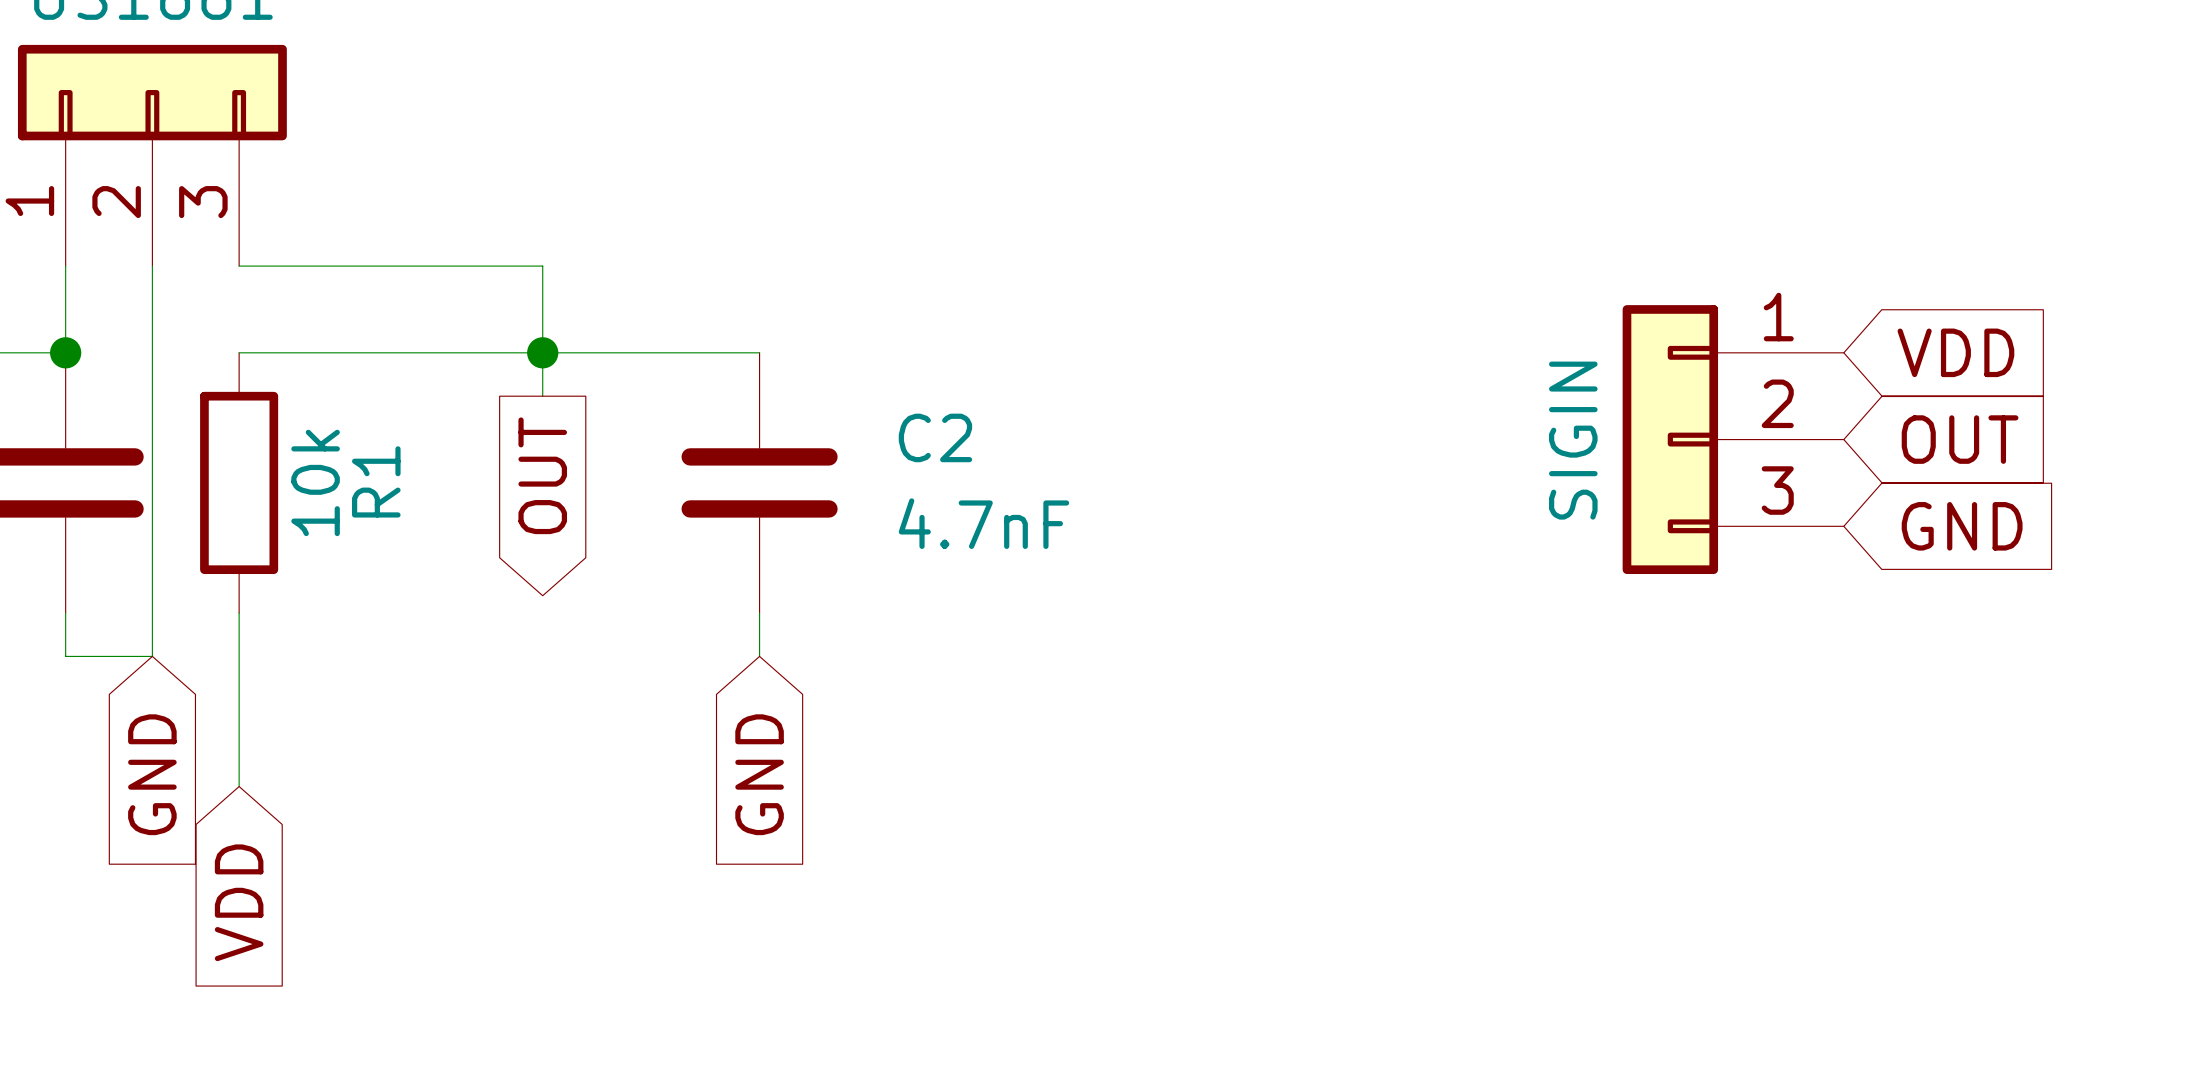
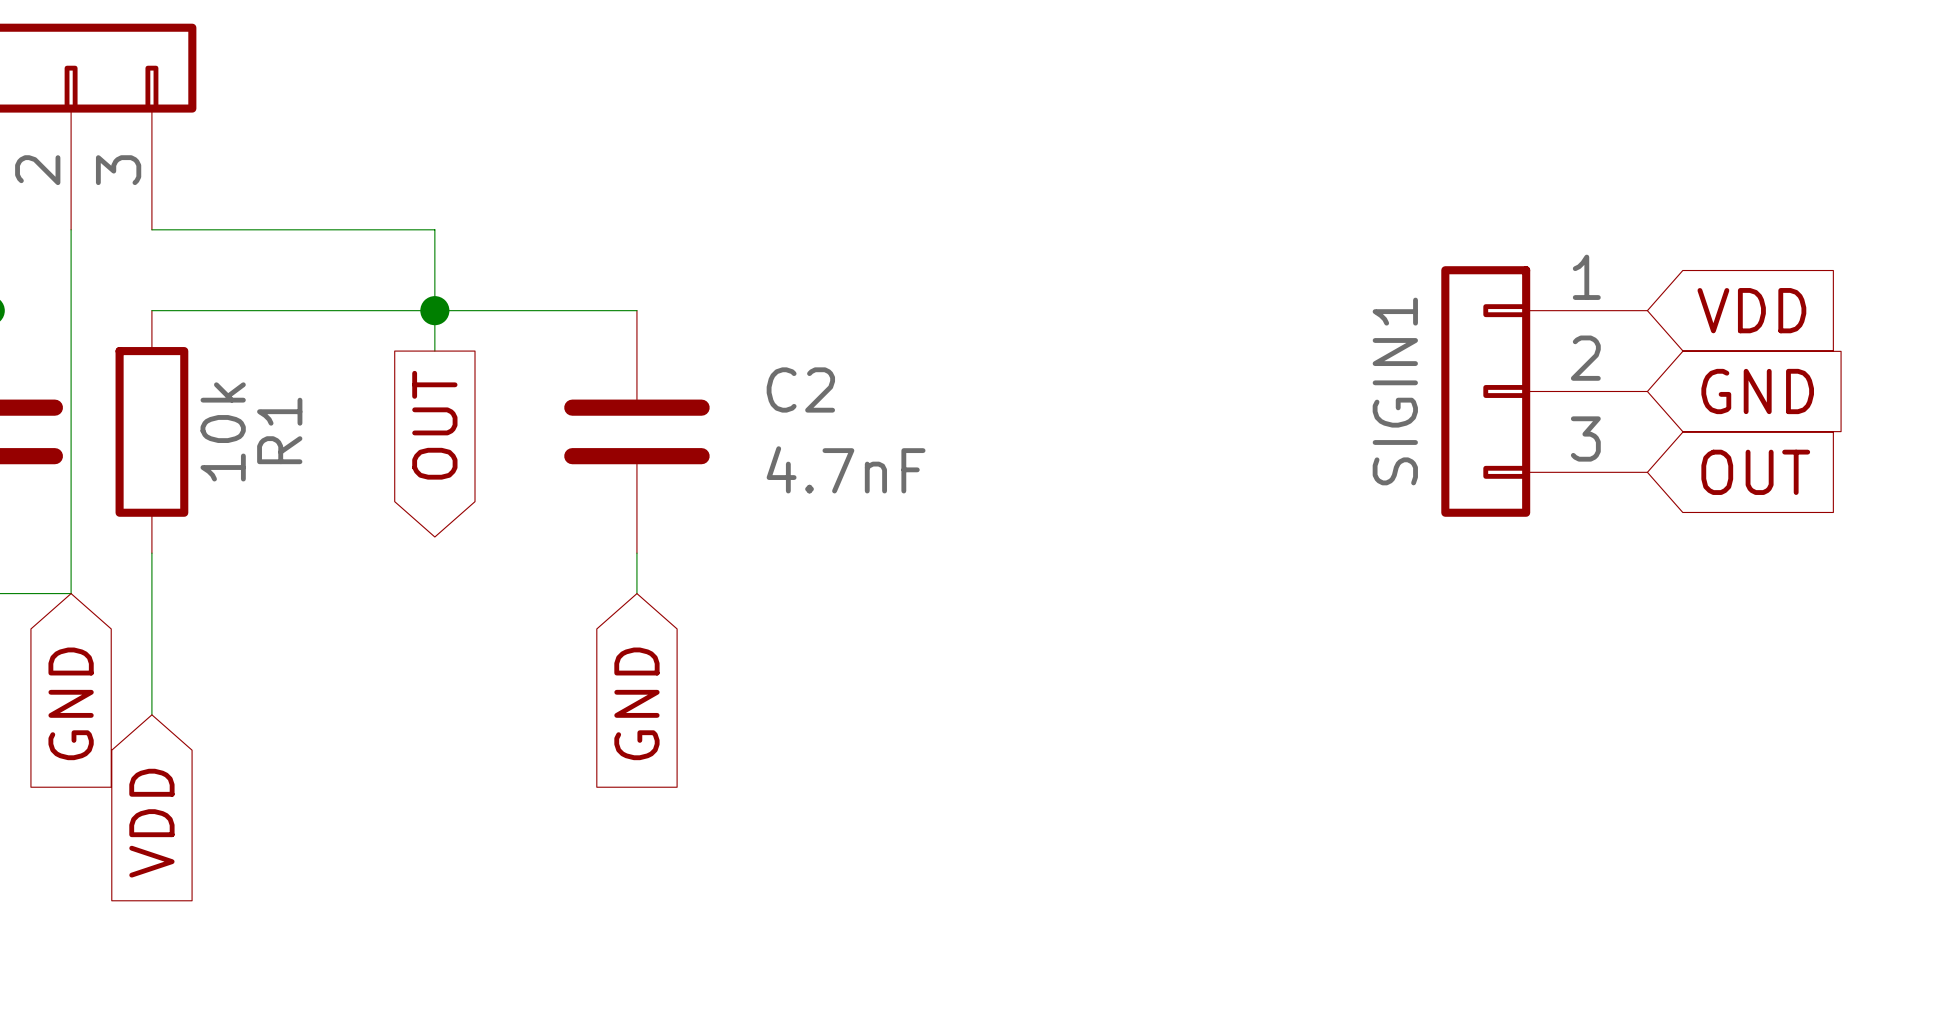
global label: OUT (1960, 439) -> GND (1757, 391)
SIGIN name: SIGIN (1573, 440) -> SIGIN1 (1395, 391)
global label: GND (1962, 526) -> OUT (1755, 472)

